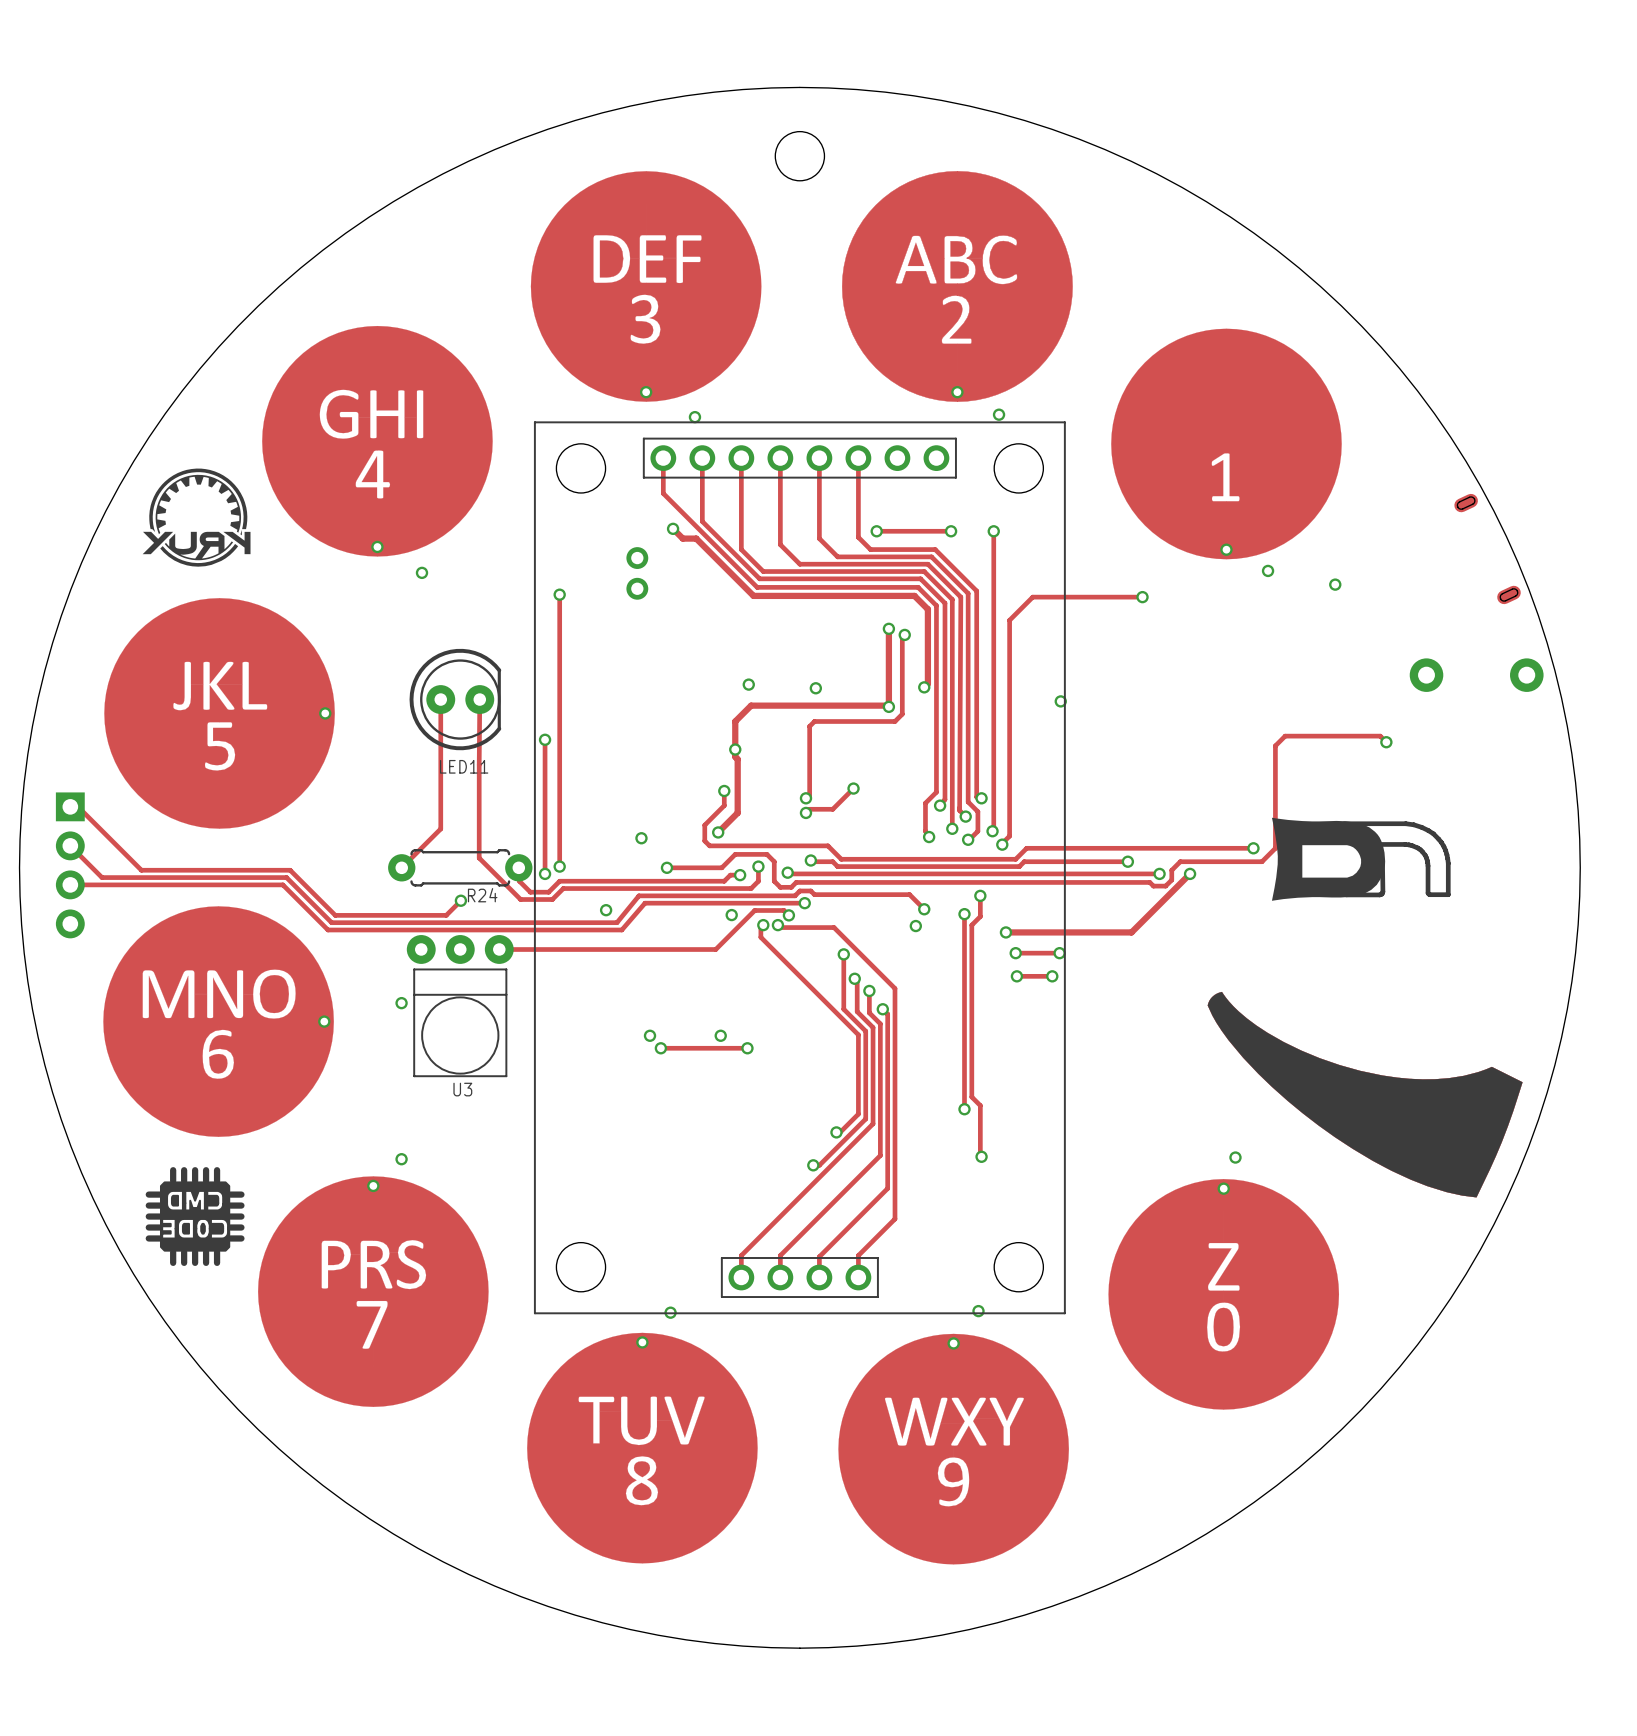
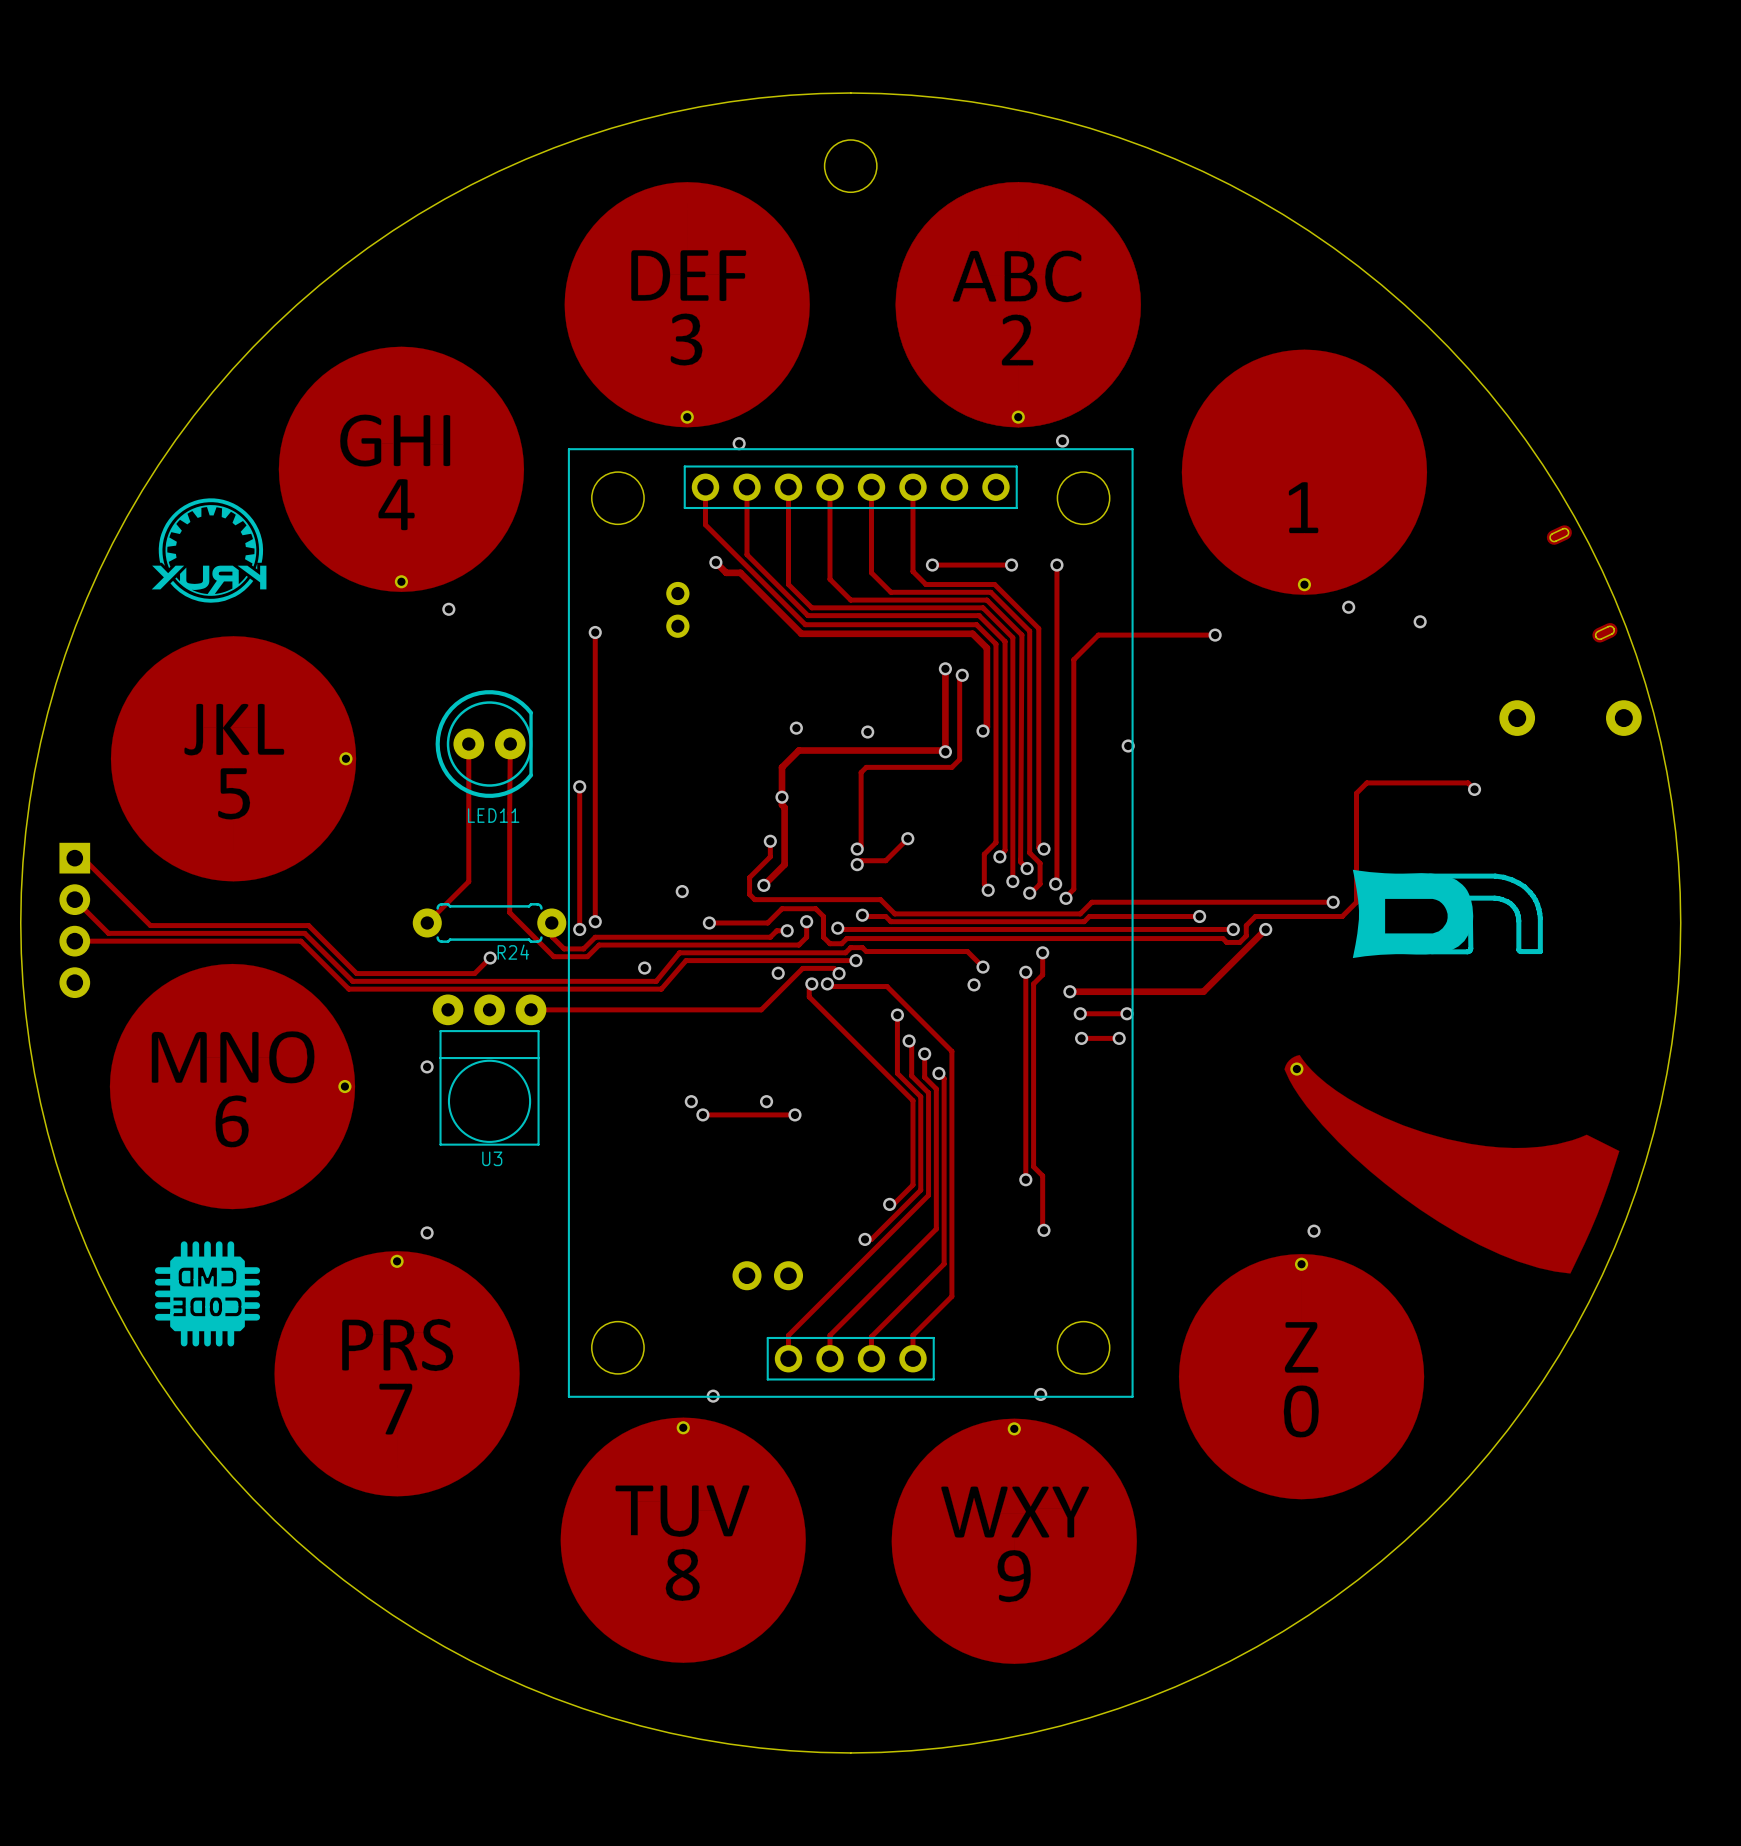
part footprint: [1207, 991, 1523, 1198] -> [1284, 1054, 1620, 1274]
part: none -> (746, 1275)
part: none -> (788, 1275)

